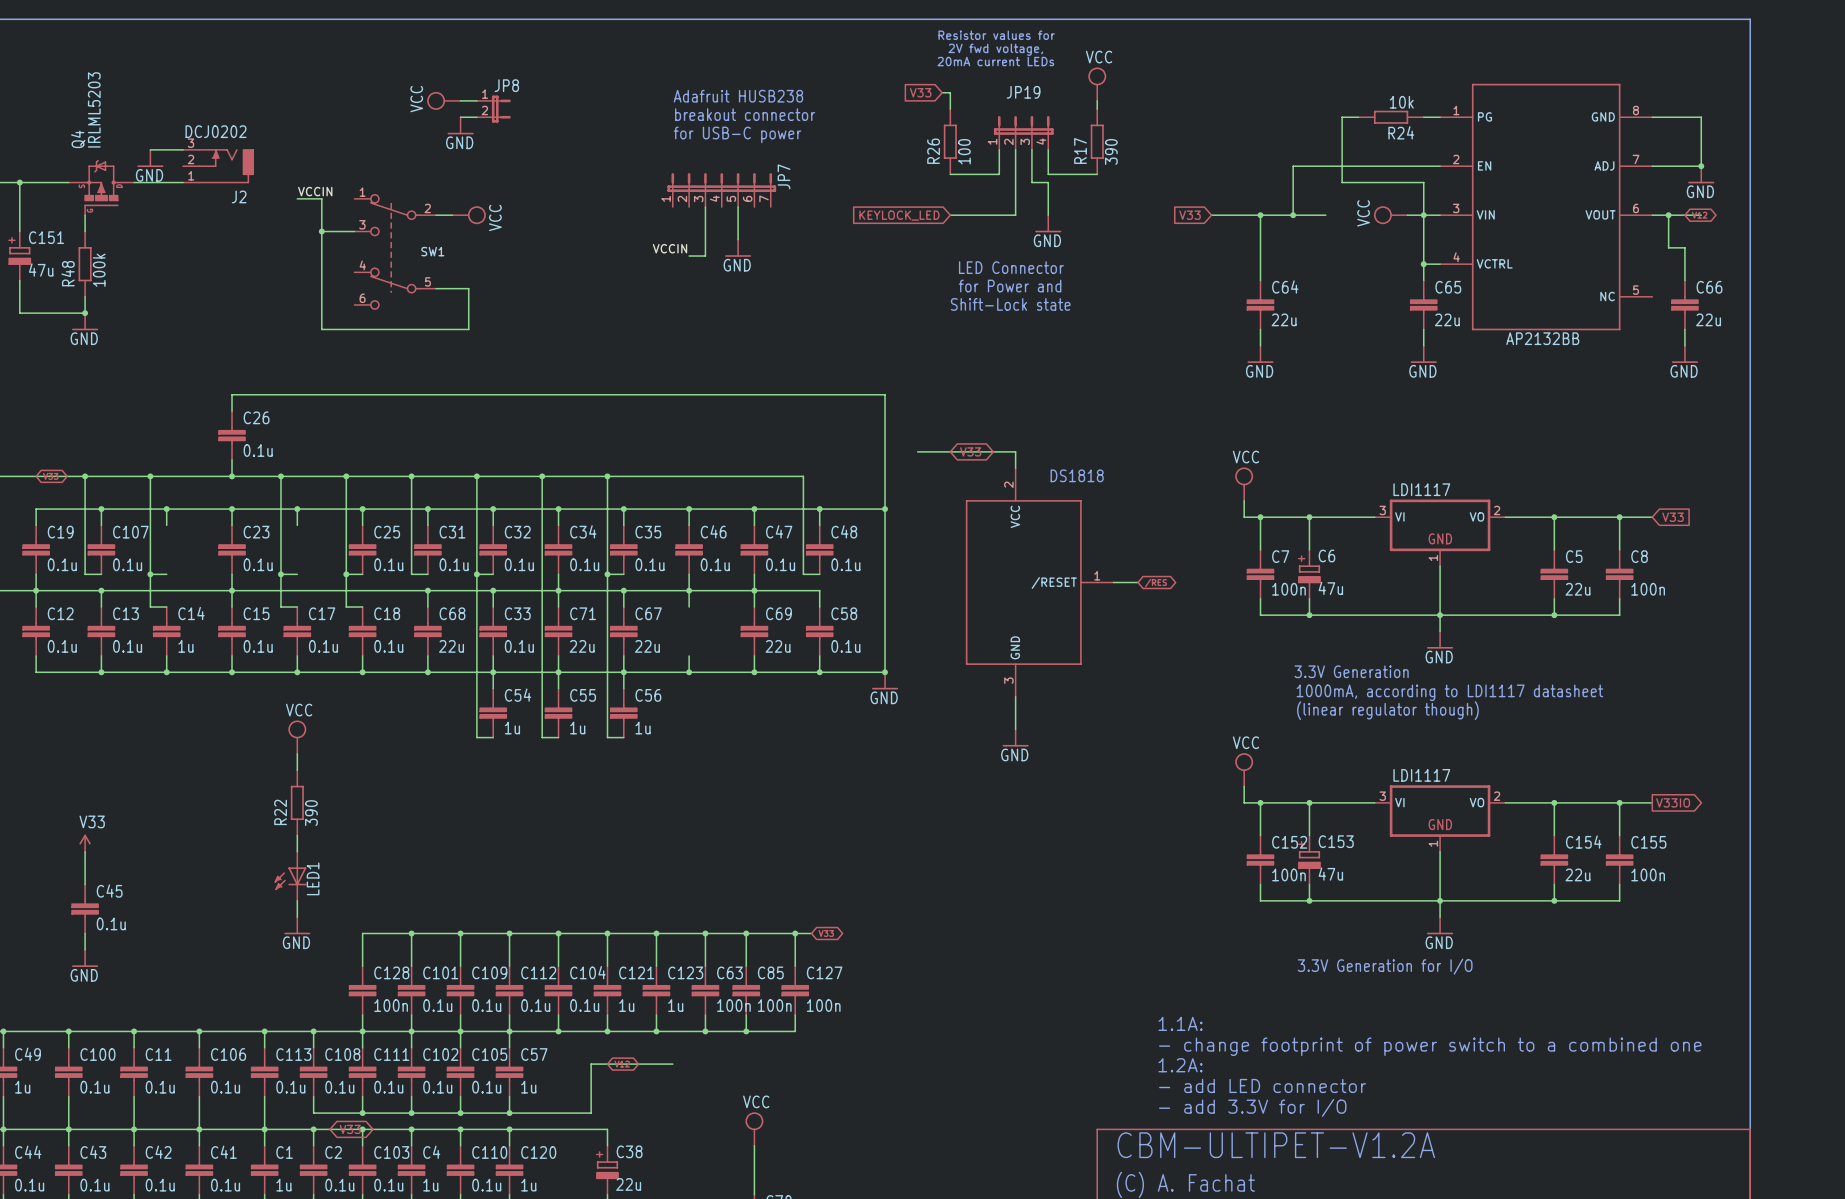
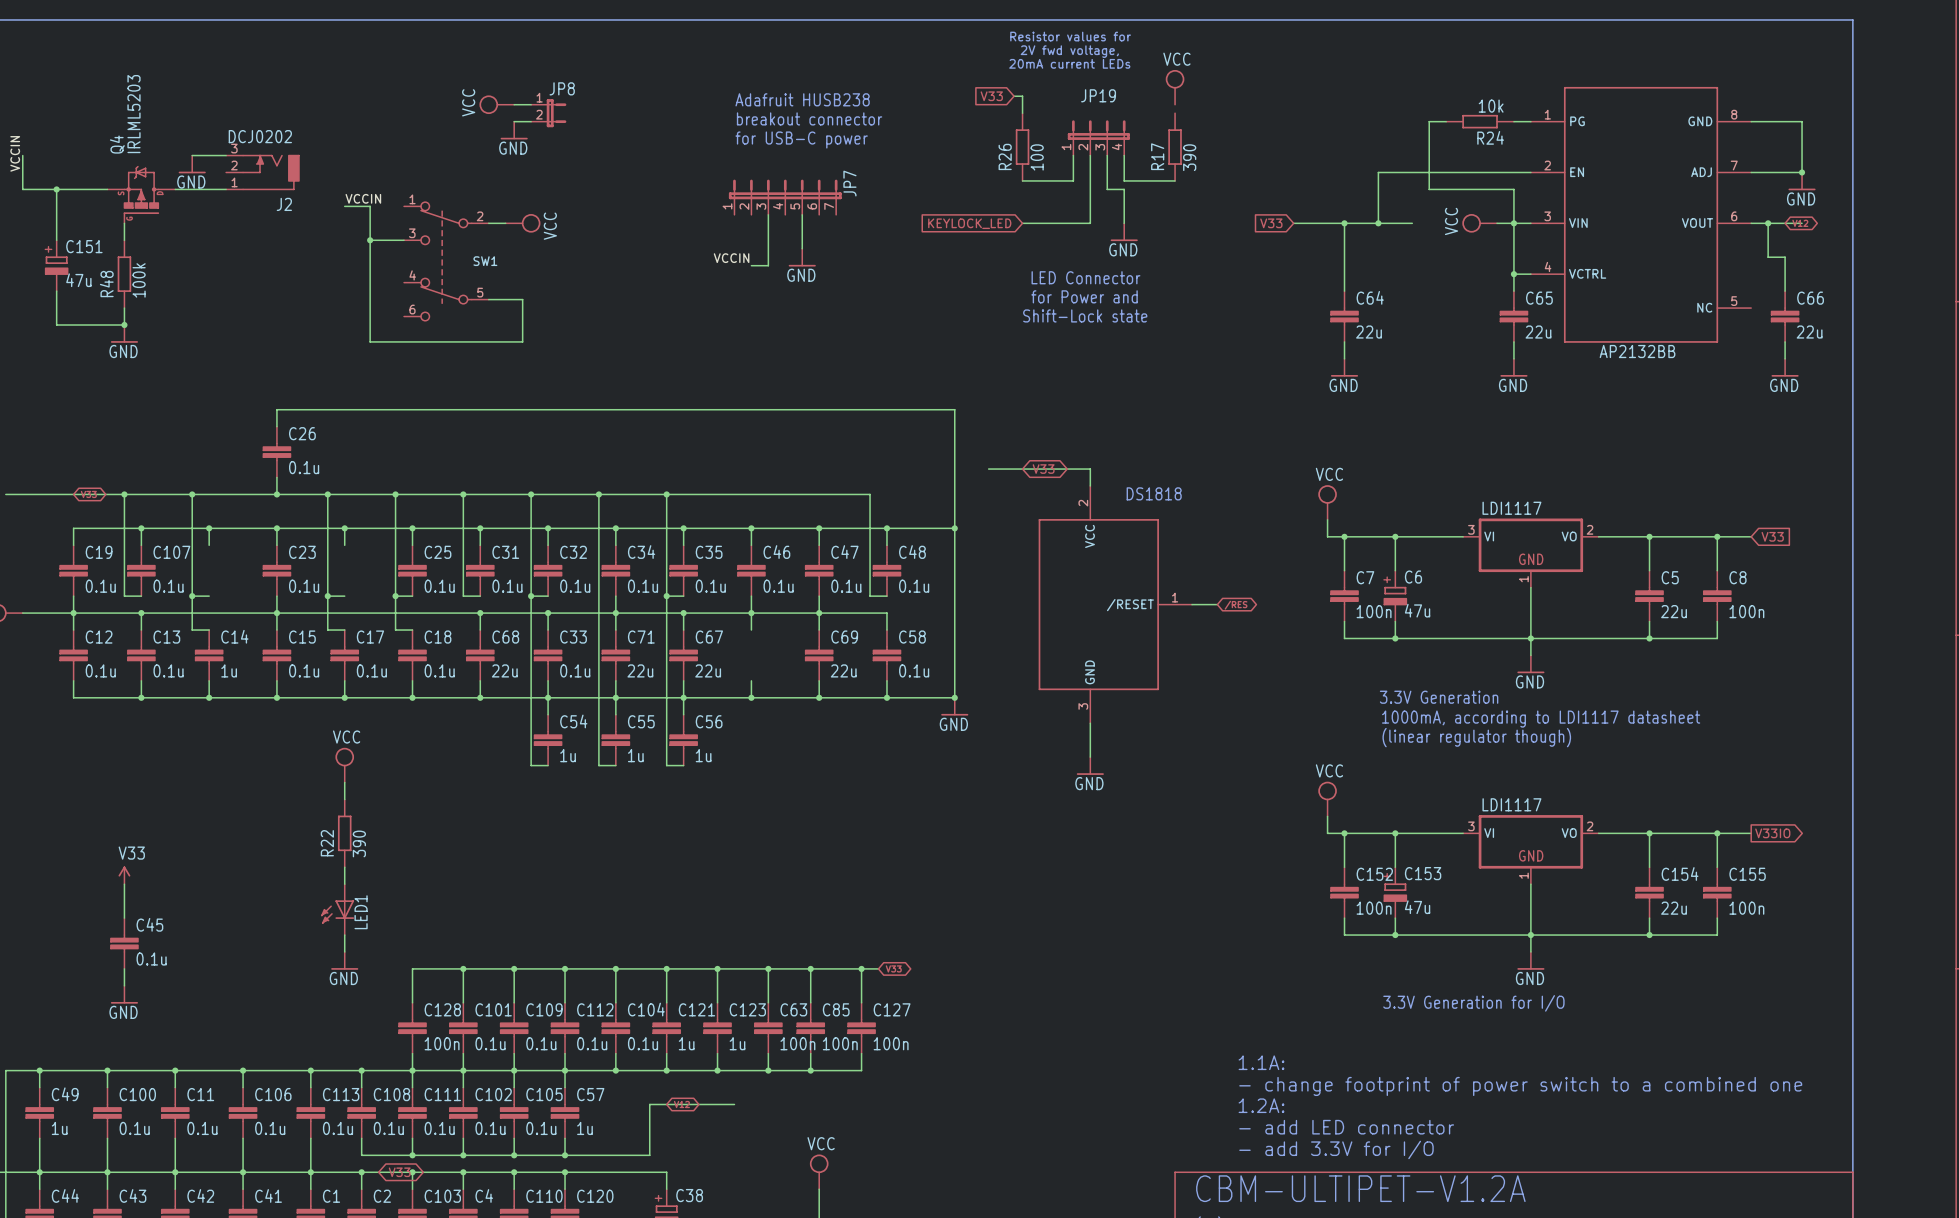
wire: (1097, 100) (1097, 109) -> none

